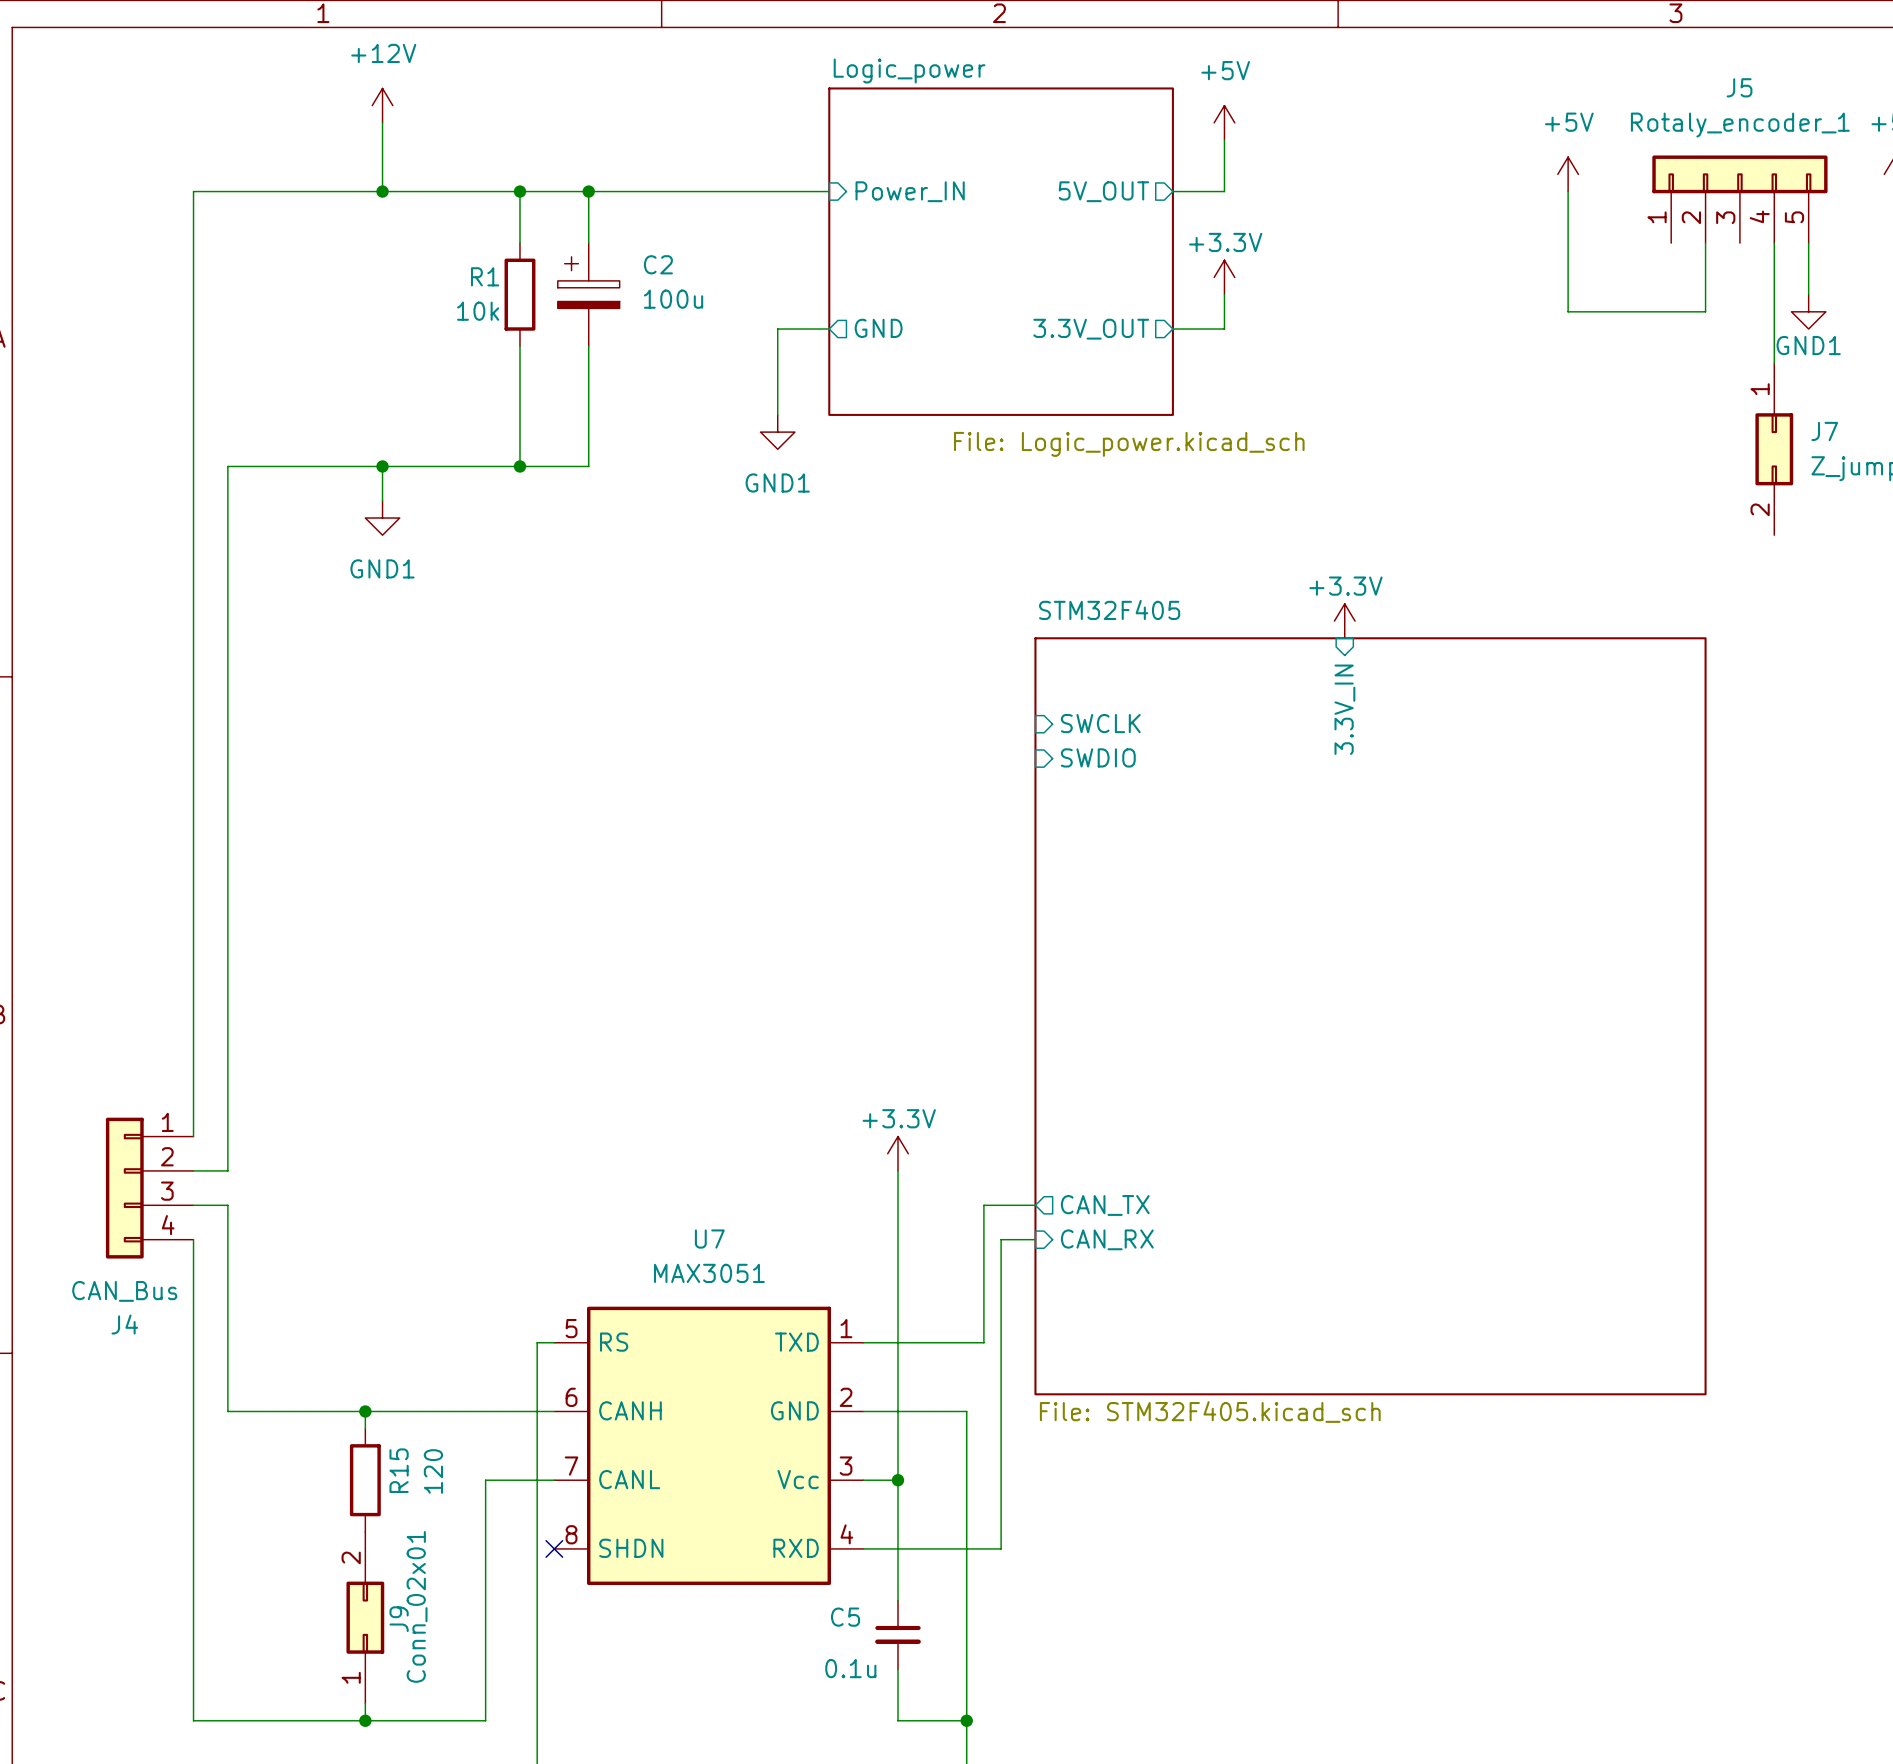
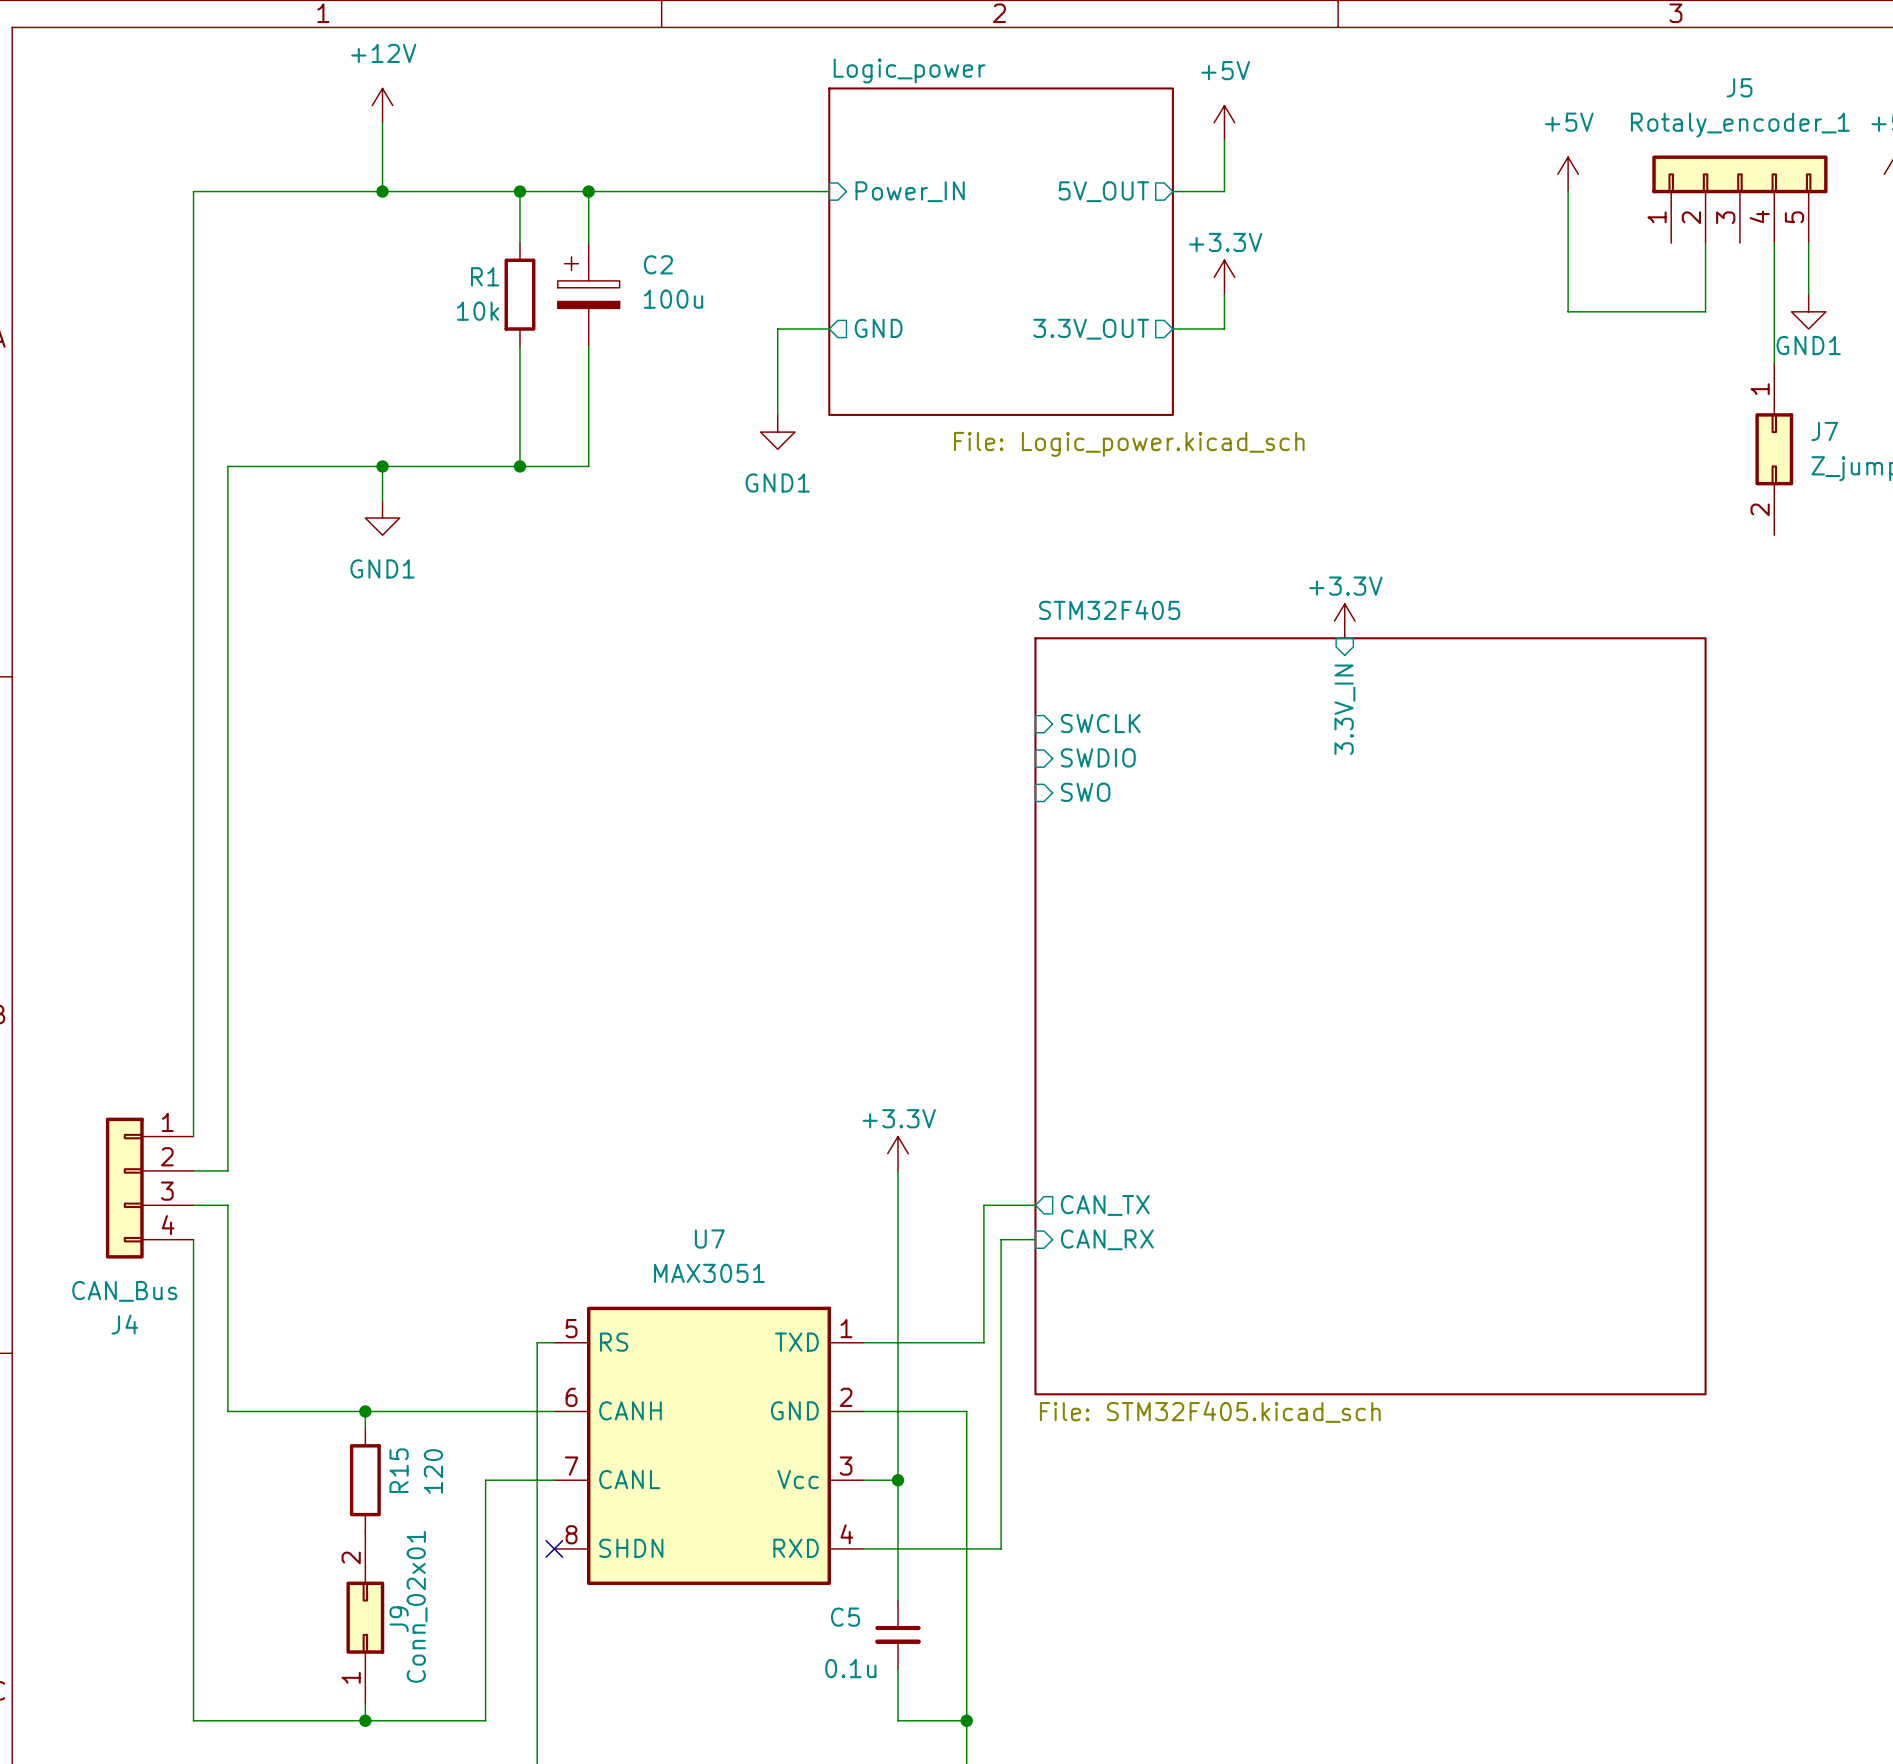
sheet pin: none -> SWO (1085, 792)

